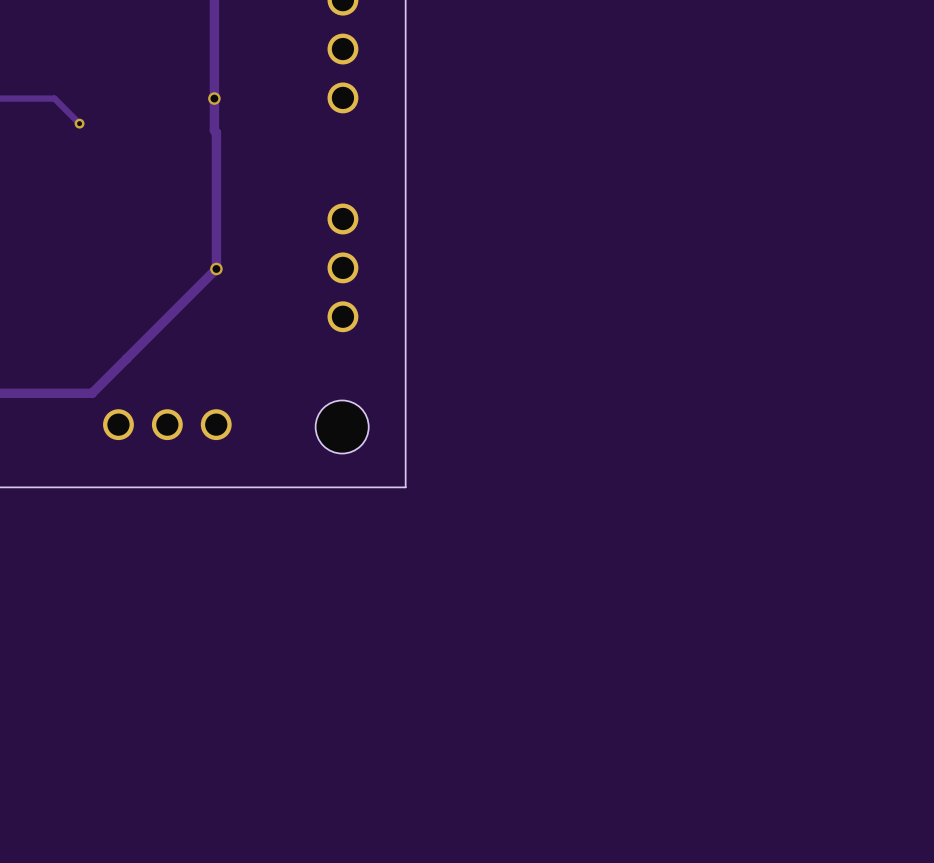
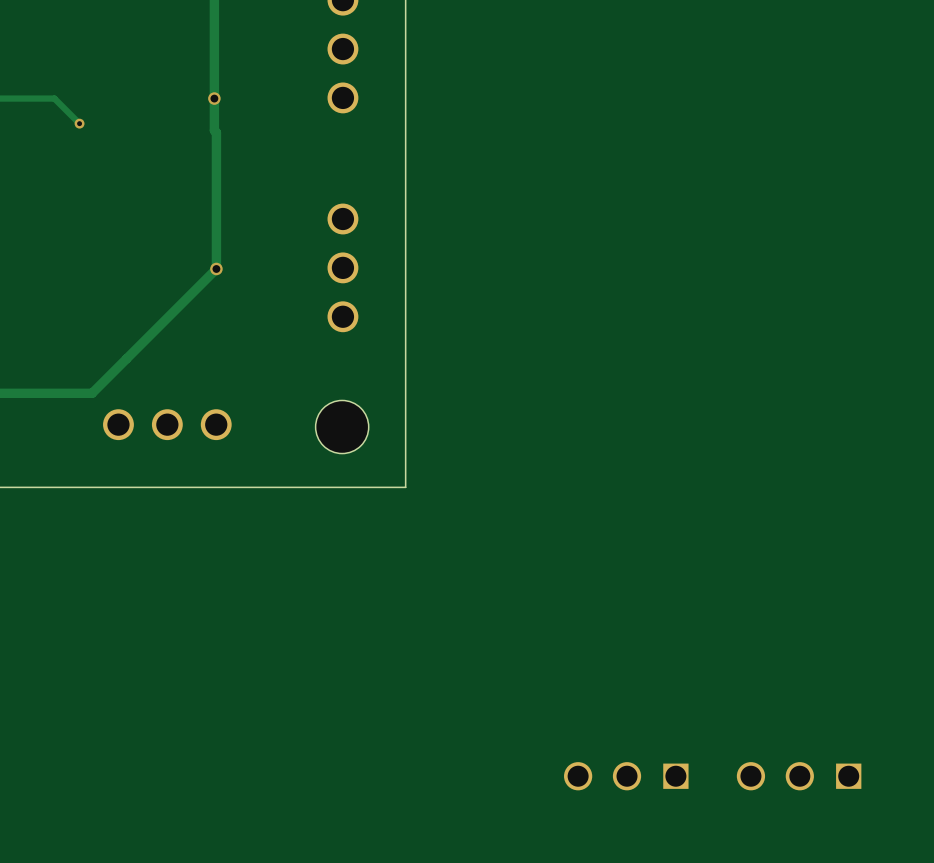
part: none -> (626, 776)
part: none -> (799, 776)

